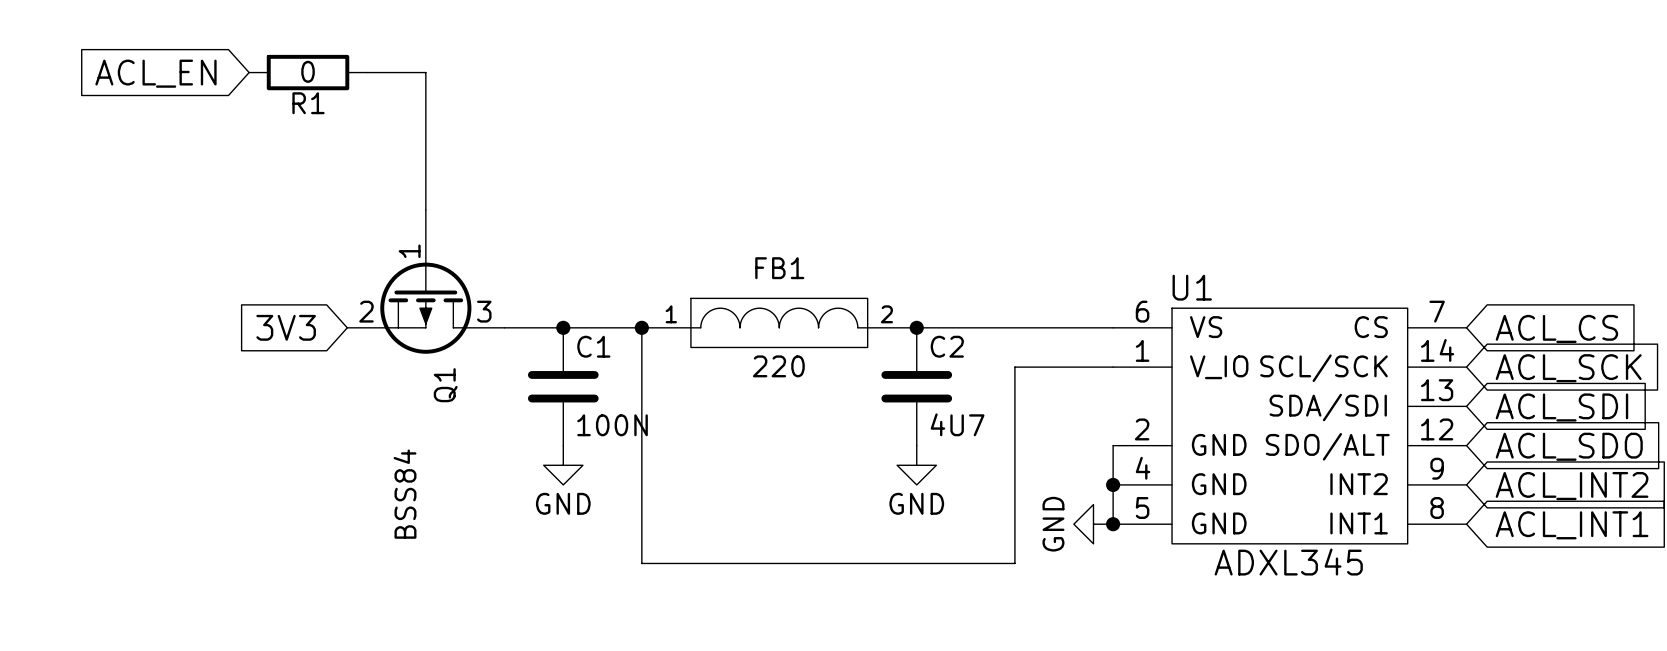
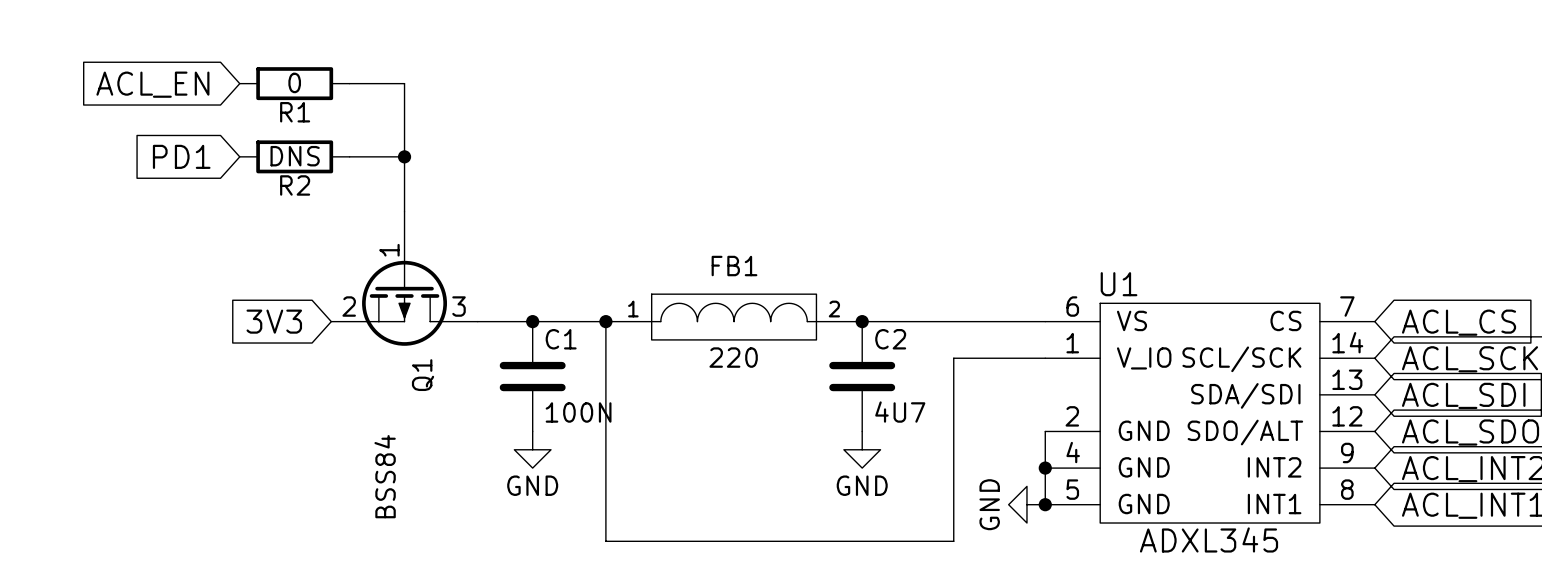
global label: none -> PD1 (181, 156)
R2: none -> DNS (294, 156)
wire: none -> (349, 156) (404, 156)
junction: none -> (404, 156)

